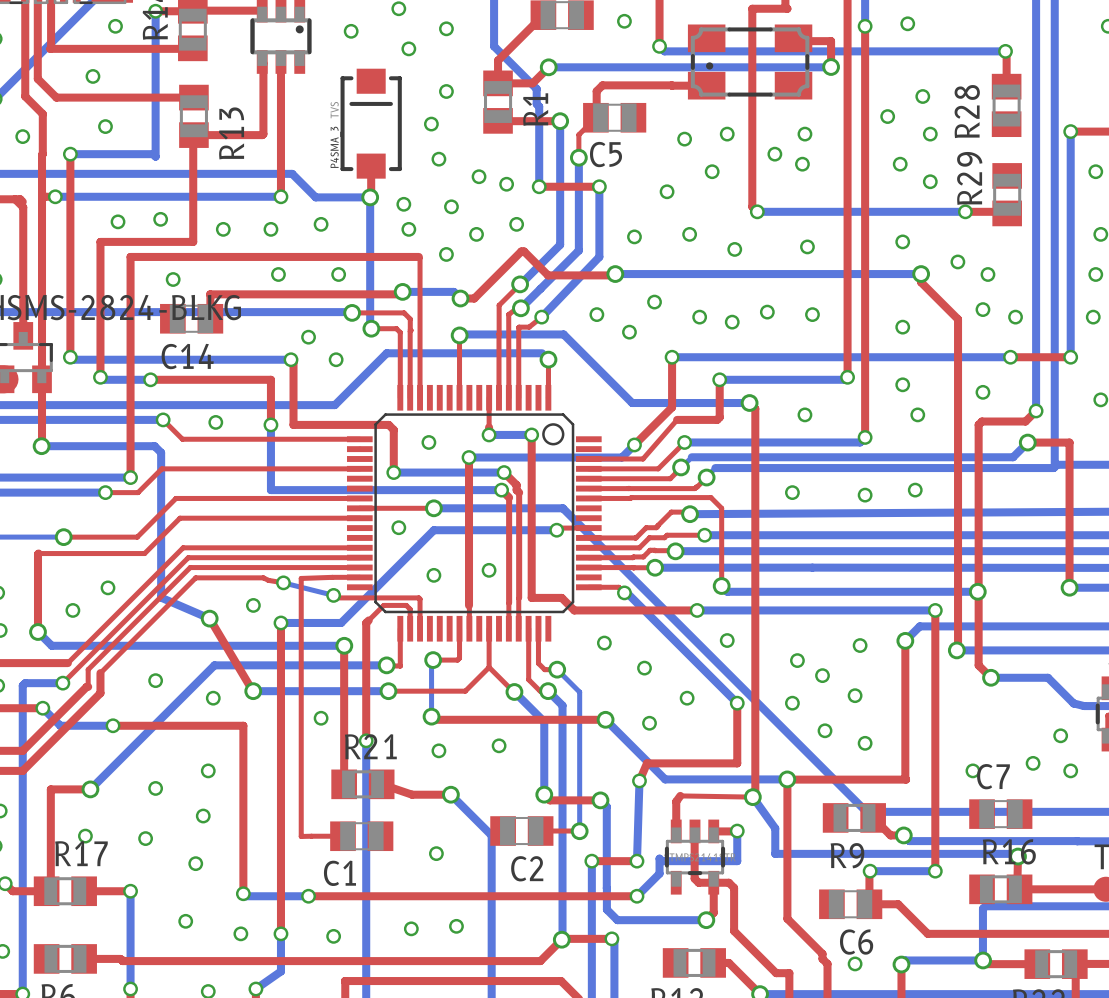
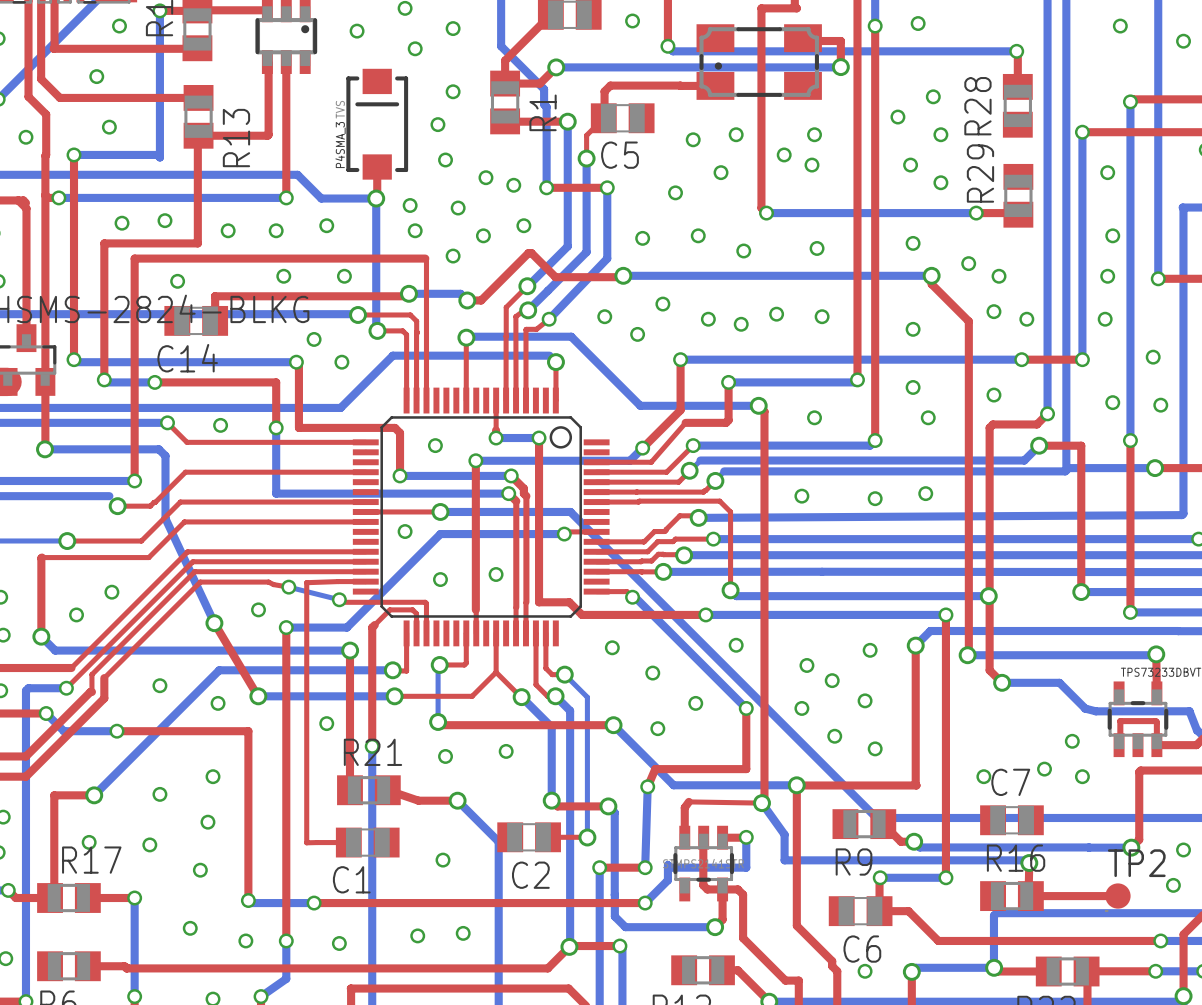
top track: (180, 468) (161, 468) (138, 492) (105, 492) -> (185, 472) (150, 506) (117, 506)
via position: (105, 492) -> (117, 506)
bottom track: (161, 514) (161, 597) (209, 618) -> (165, 518) (214, 623)

